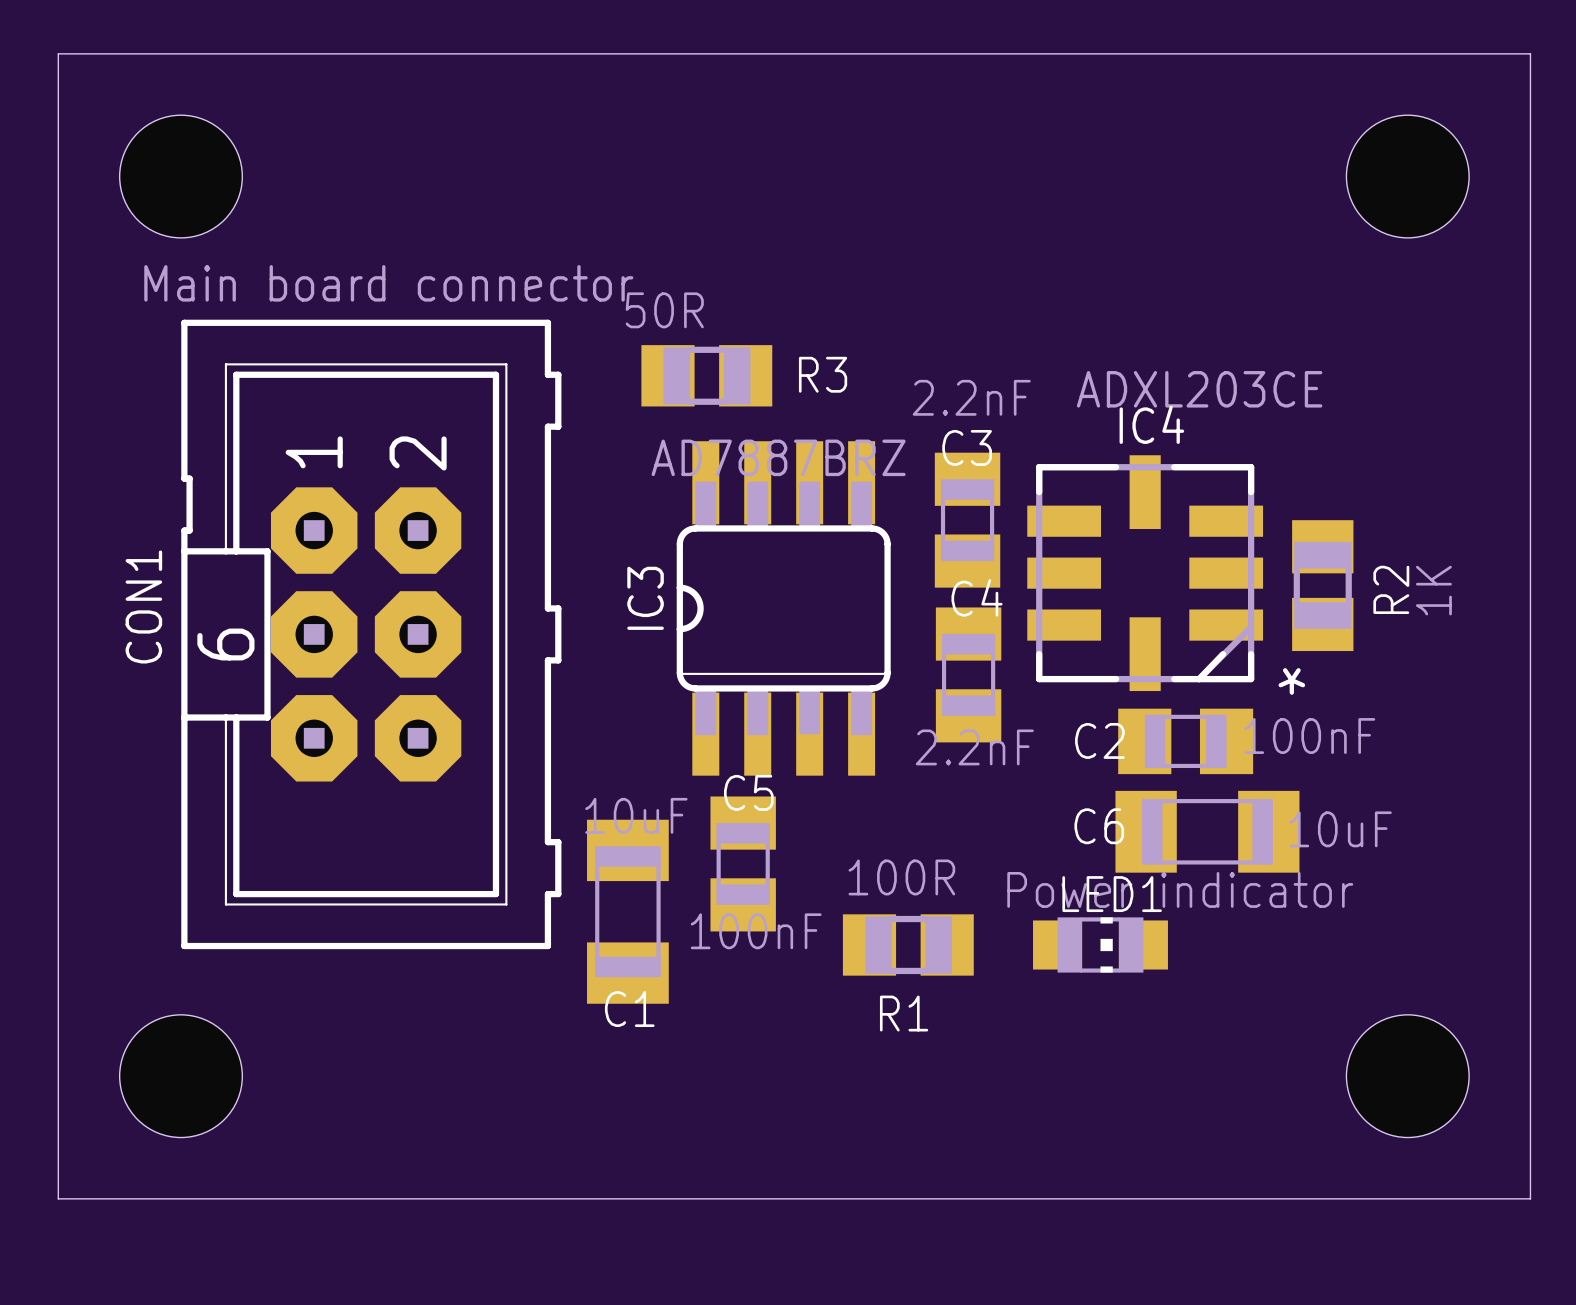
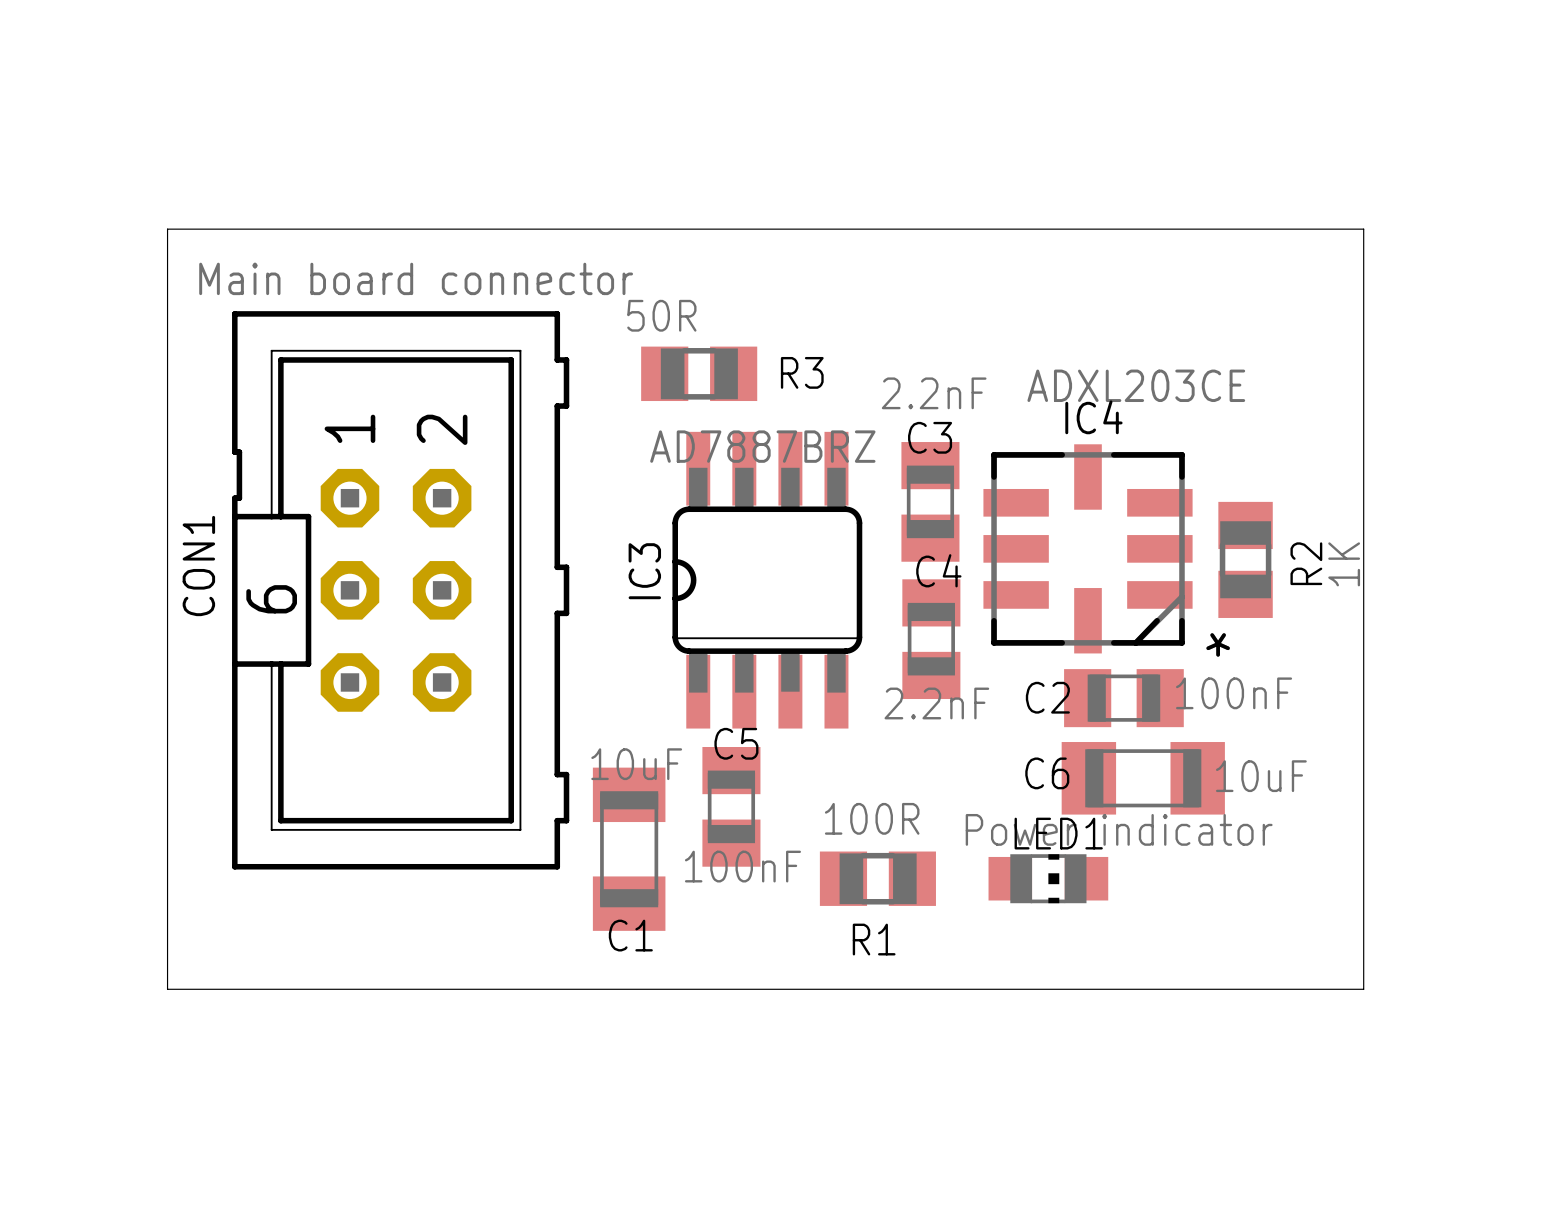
board edge: (58, 53) (1530, 53) (1530, 1198) (58, 1198) (58, 53) -> (167, 229) (167, 989) (1363, 989) (1363, 229) (167, 229)
hole: (181, 176) -> none
hole: (1407, 176) -> none
CON1 footprint: [181, 319, 562, 950] -> [232, 311, 570, 870]
hole: (181, 1076) -> none
hole: (1407, 1076) -> none

